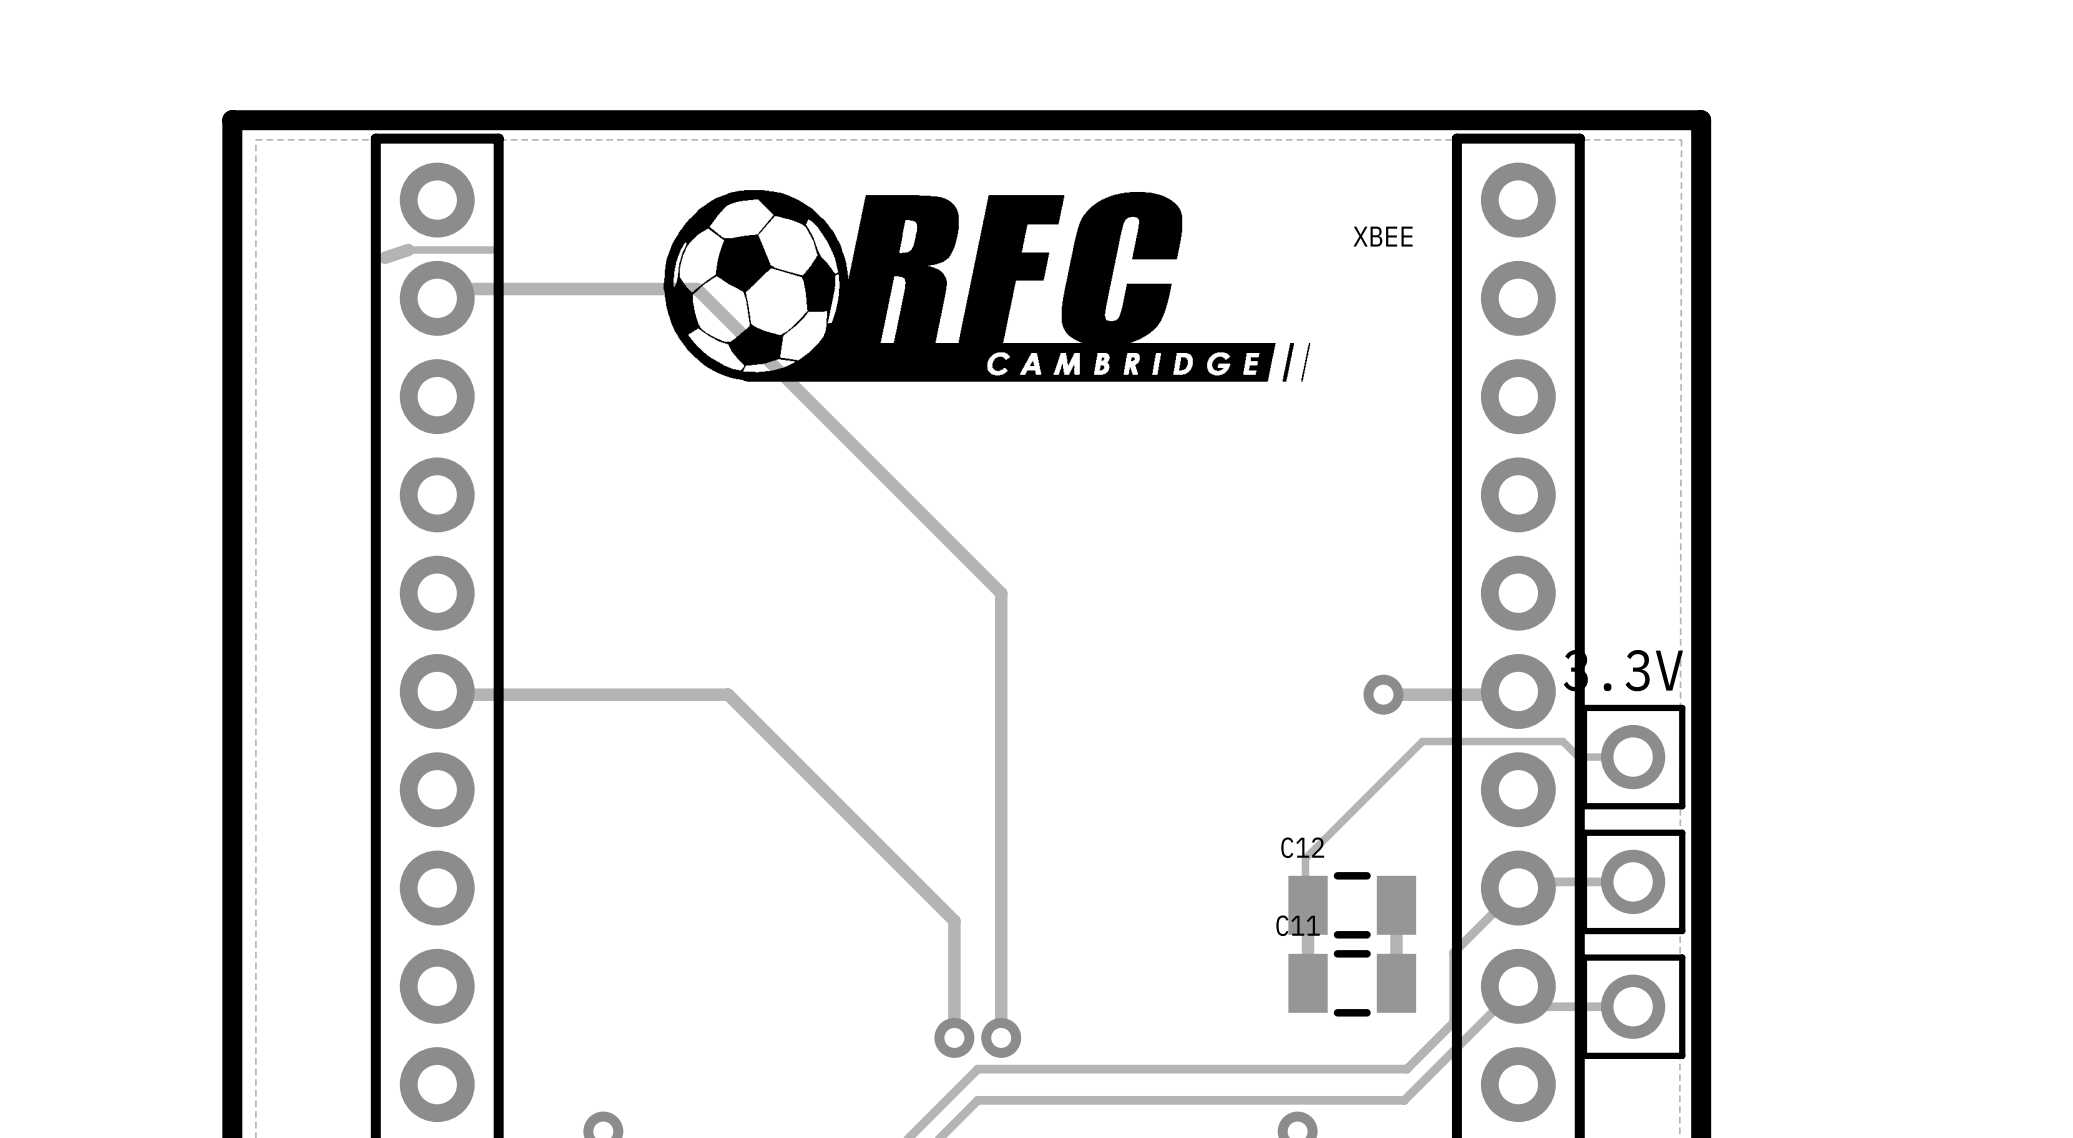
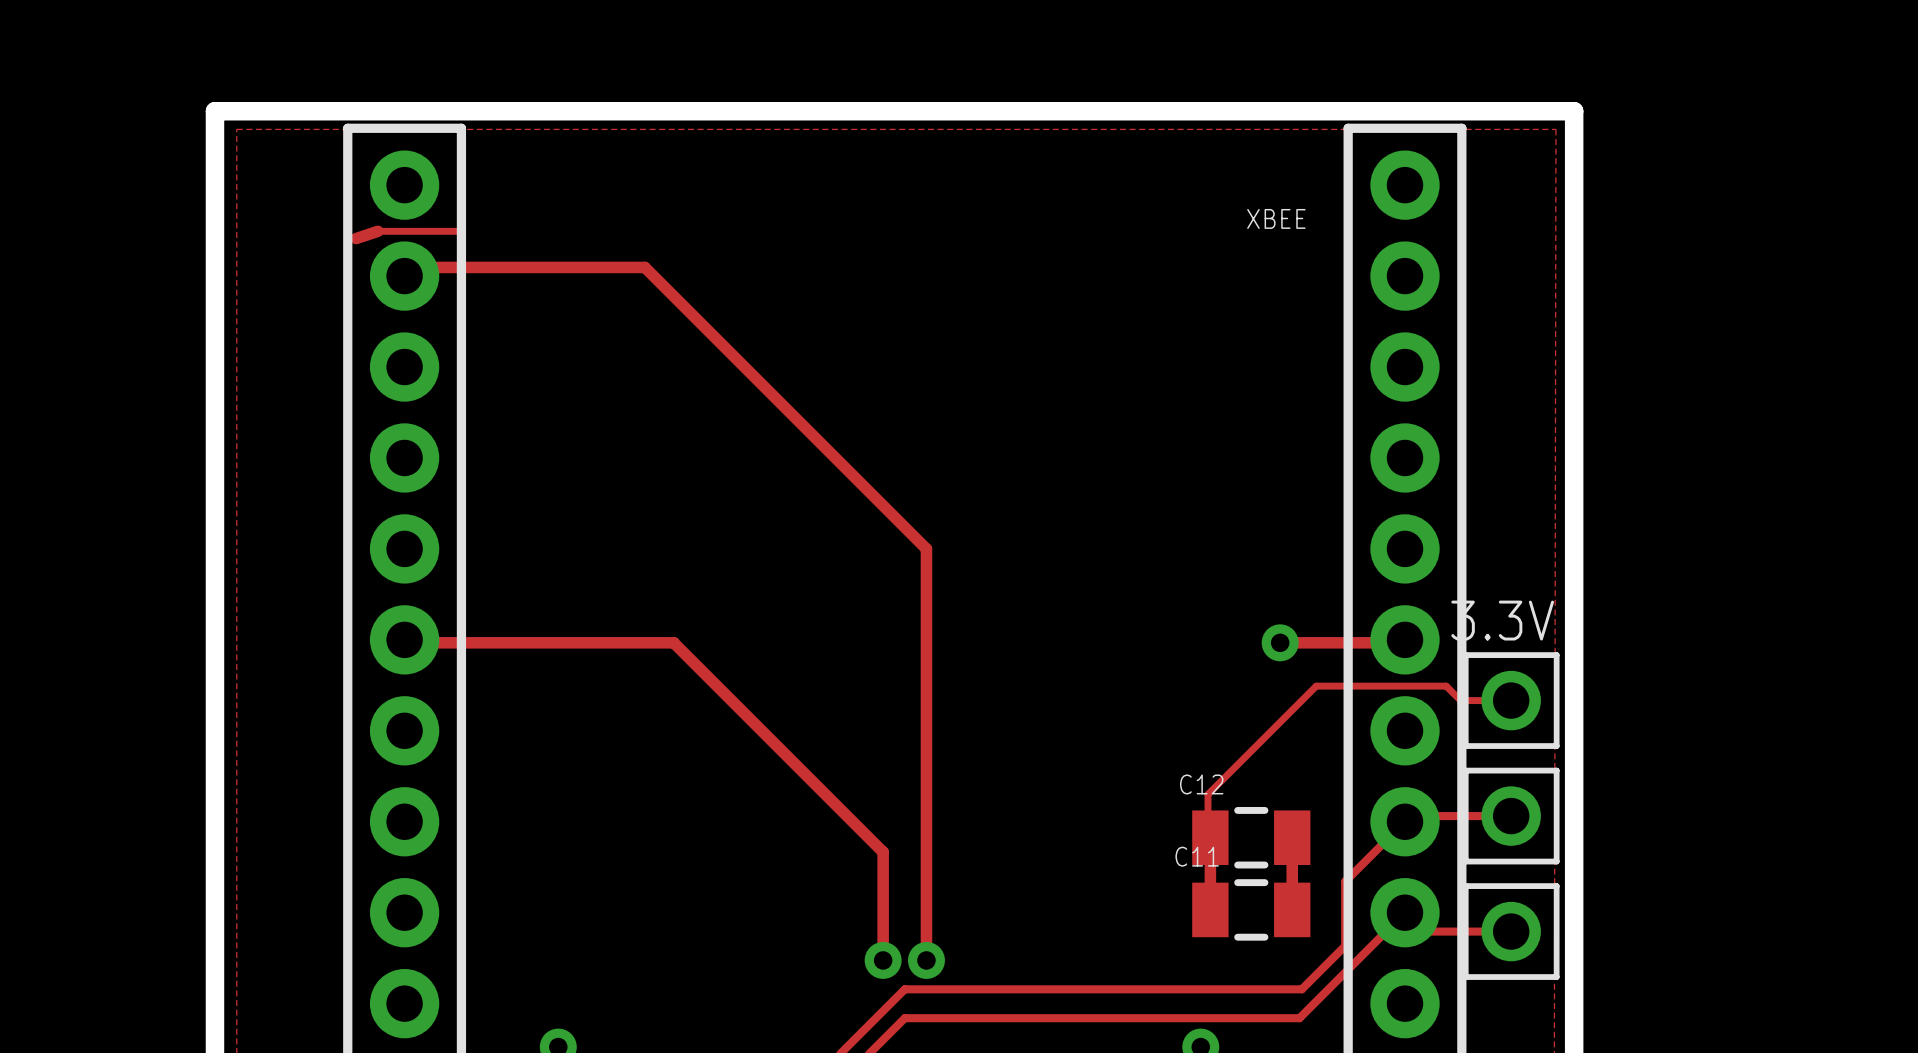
drawing: [663, 190, 1311, 382] -> none

